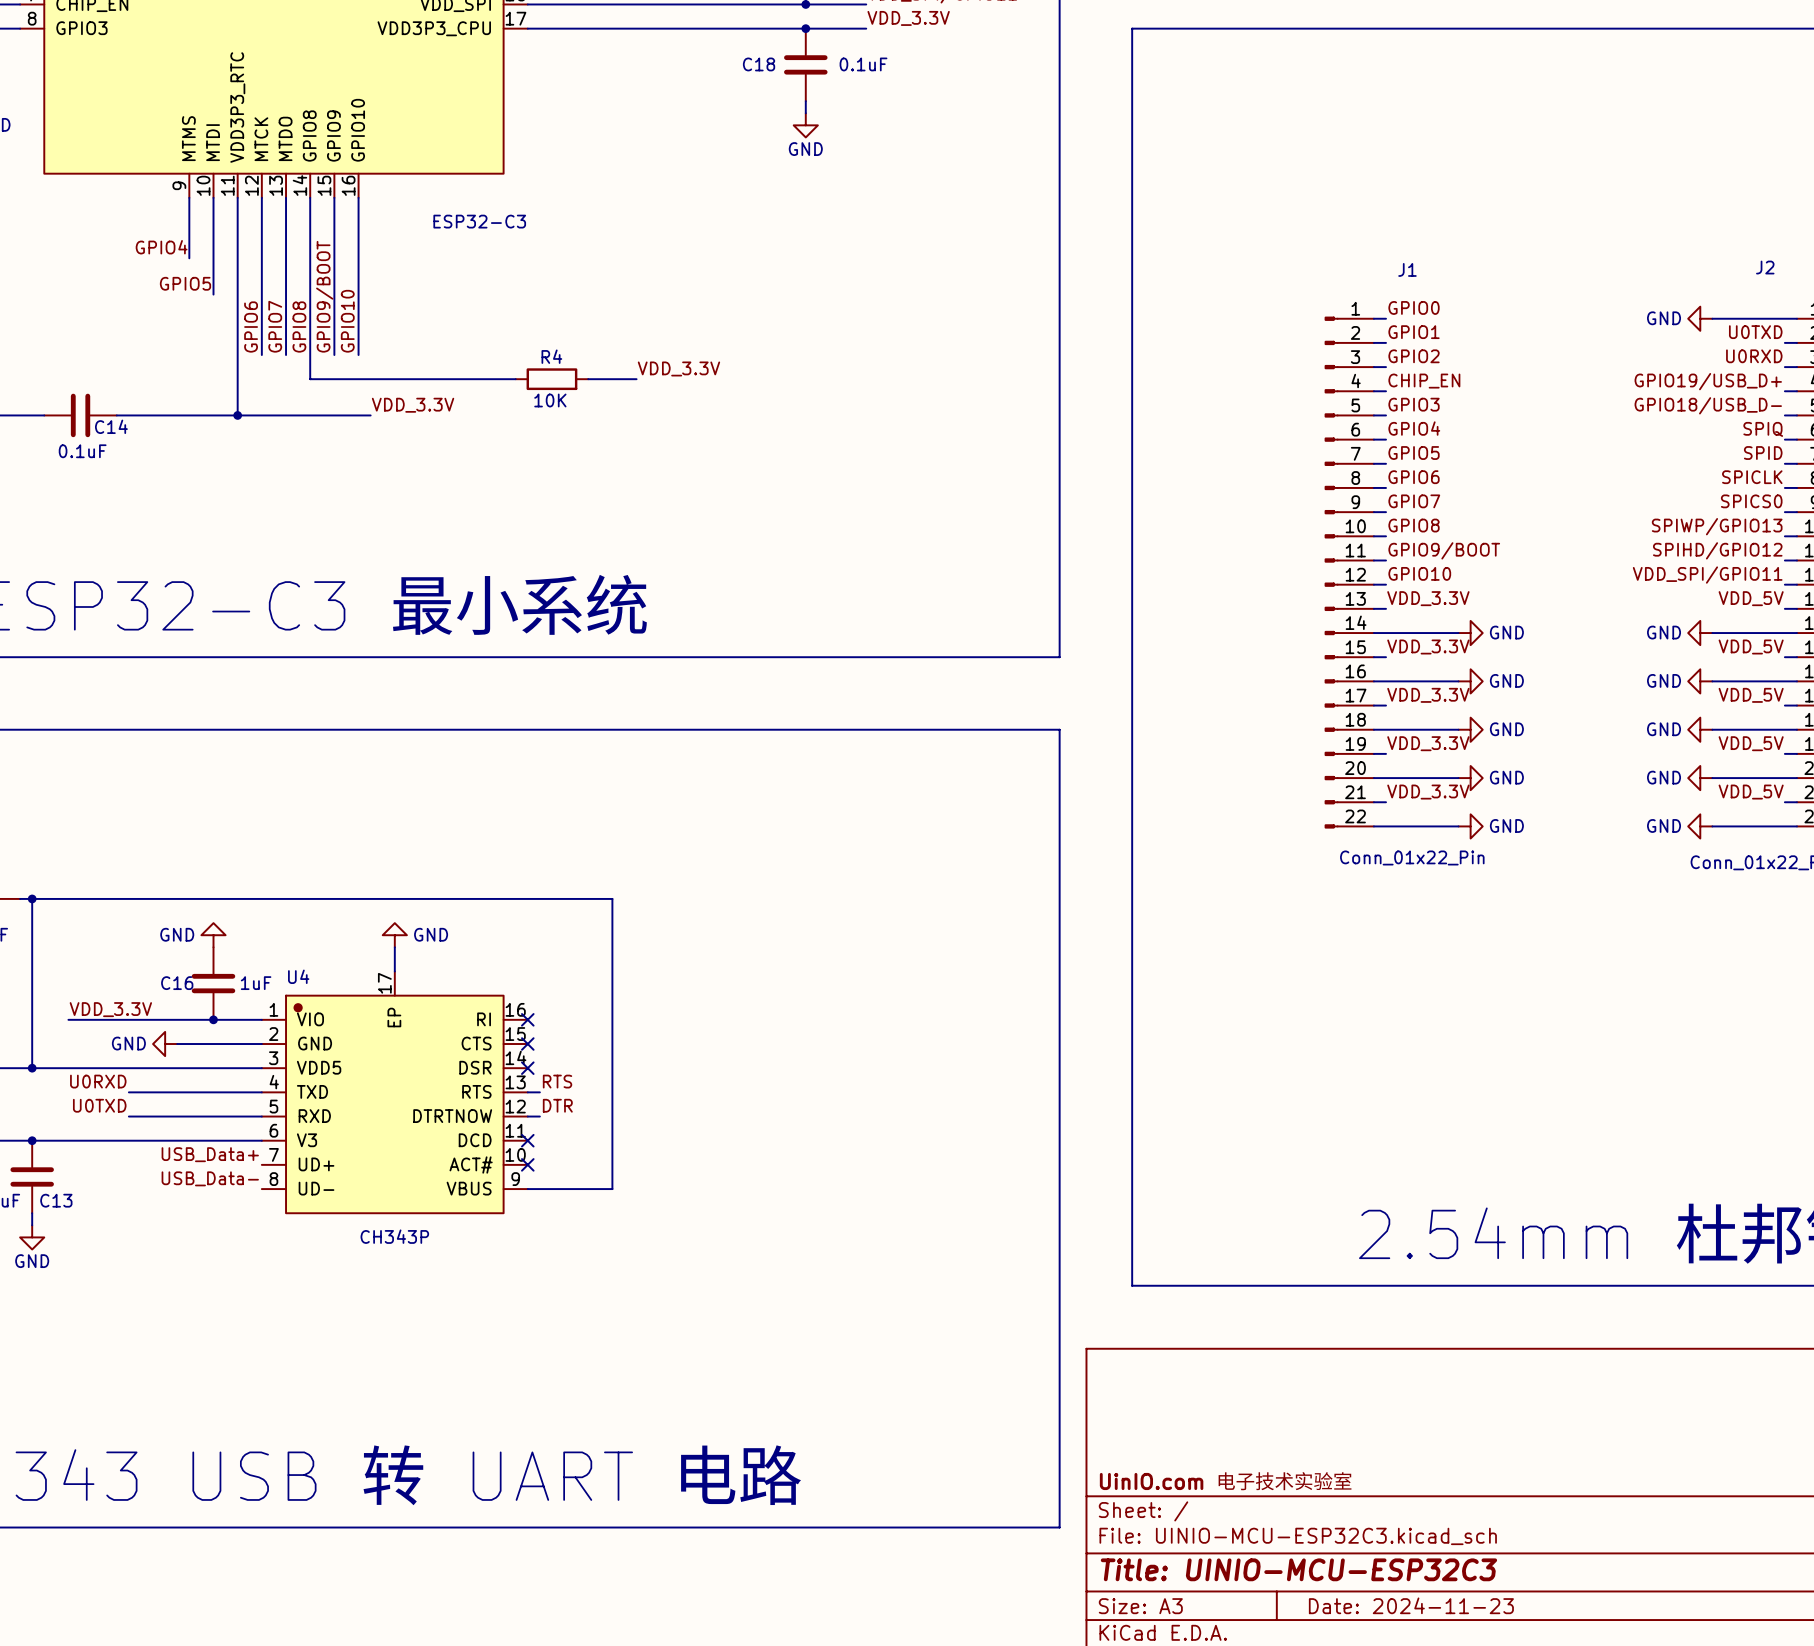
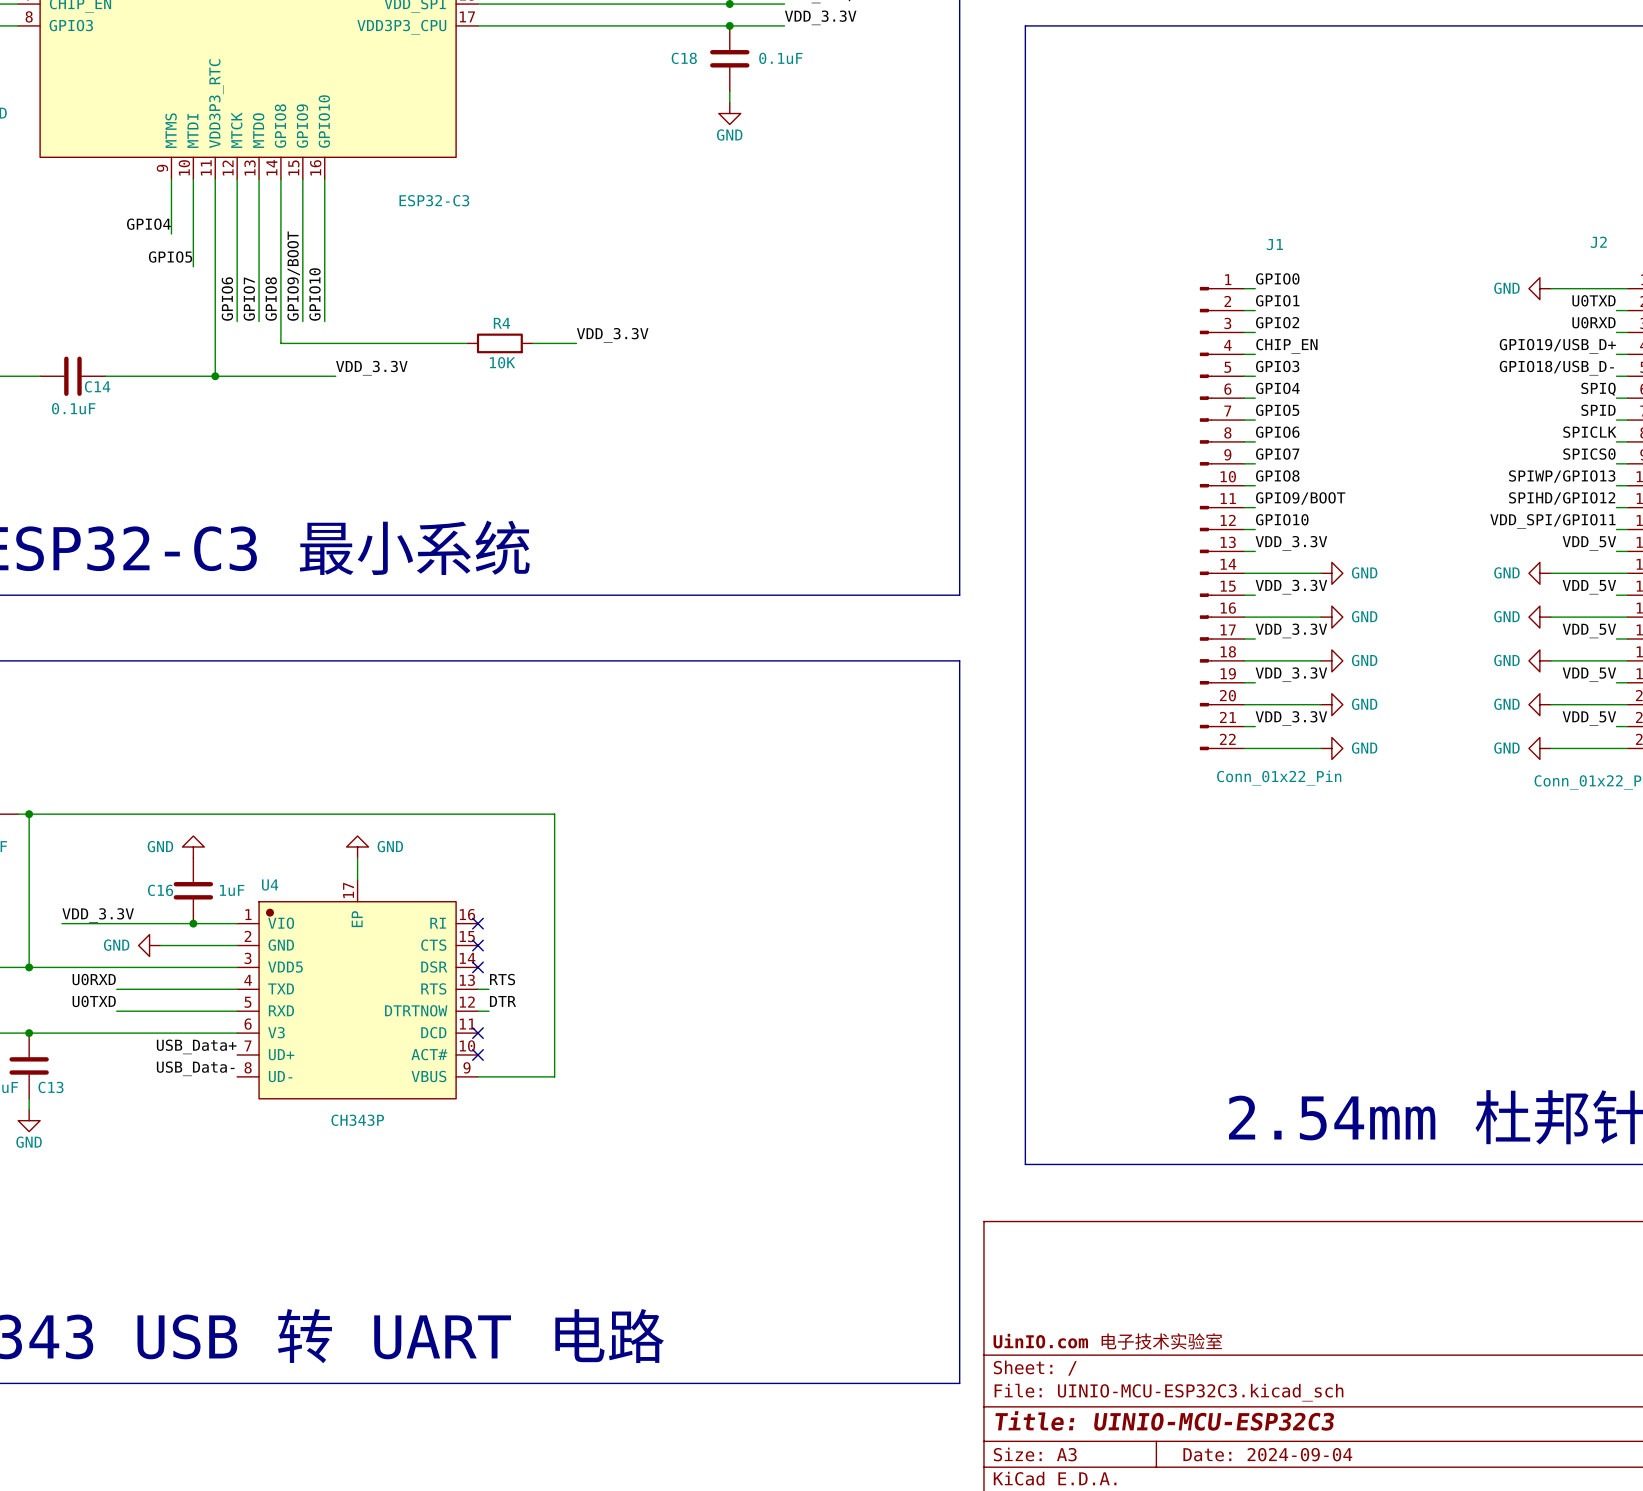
title block: Date: 2024-11-23 (1411, 1605) -> Date: 2024-09-04 (1267, 1454)

